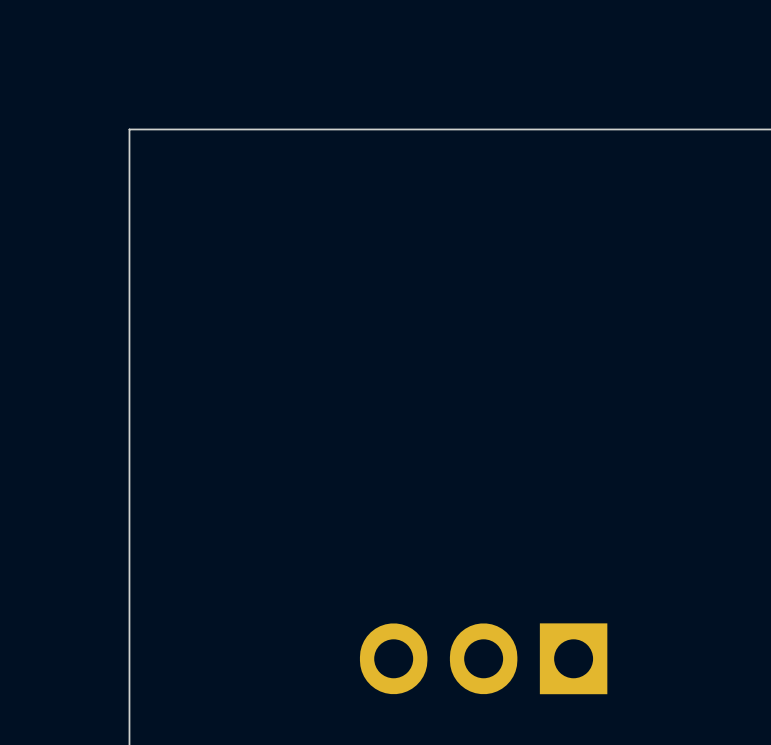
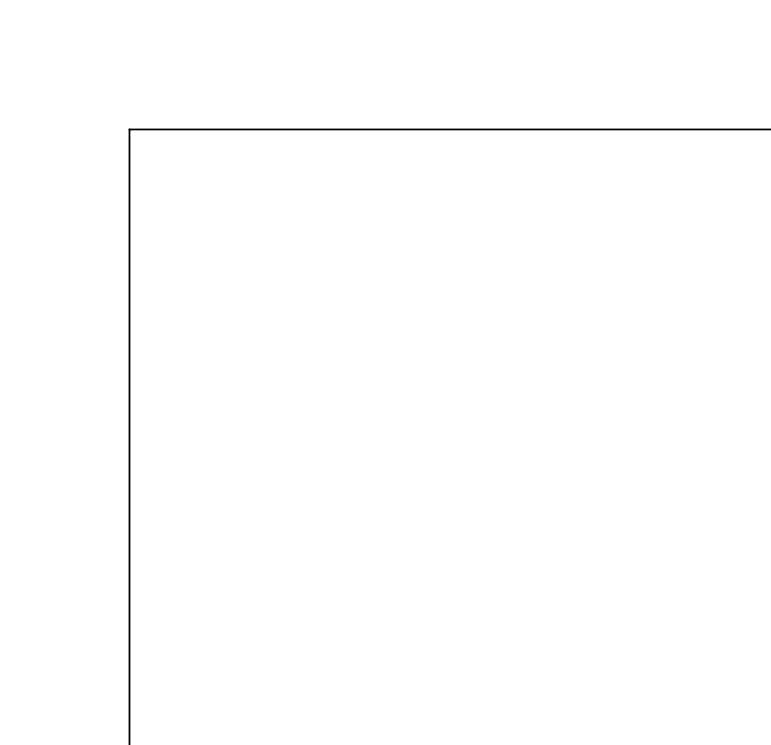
part: (483, 658) -> none

